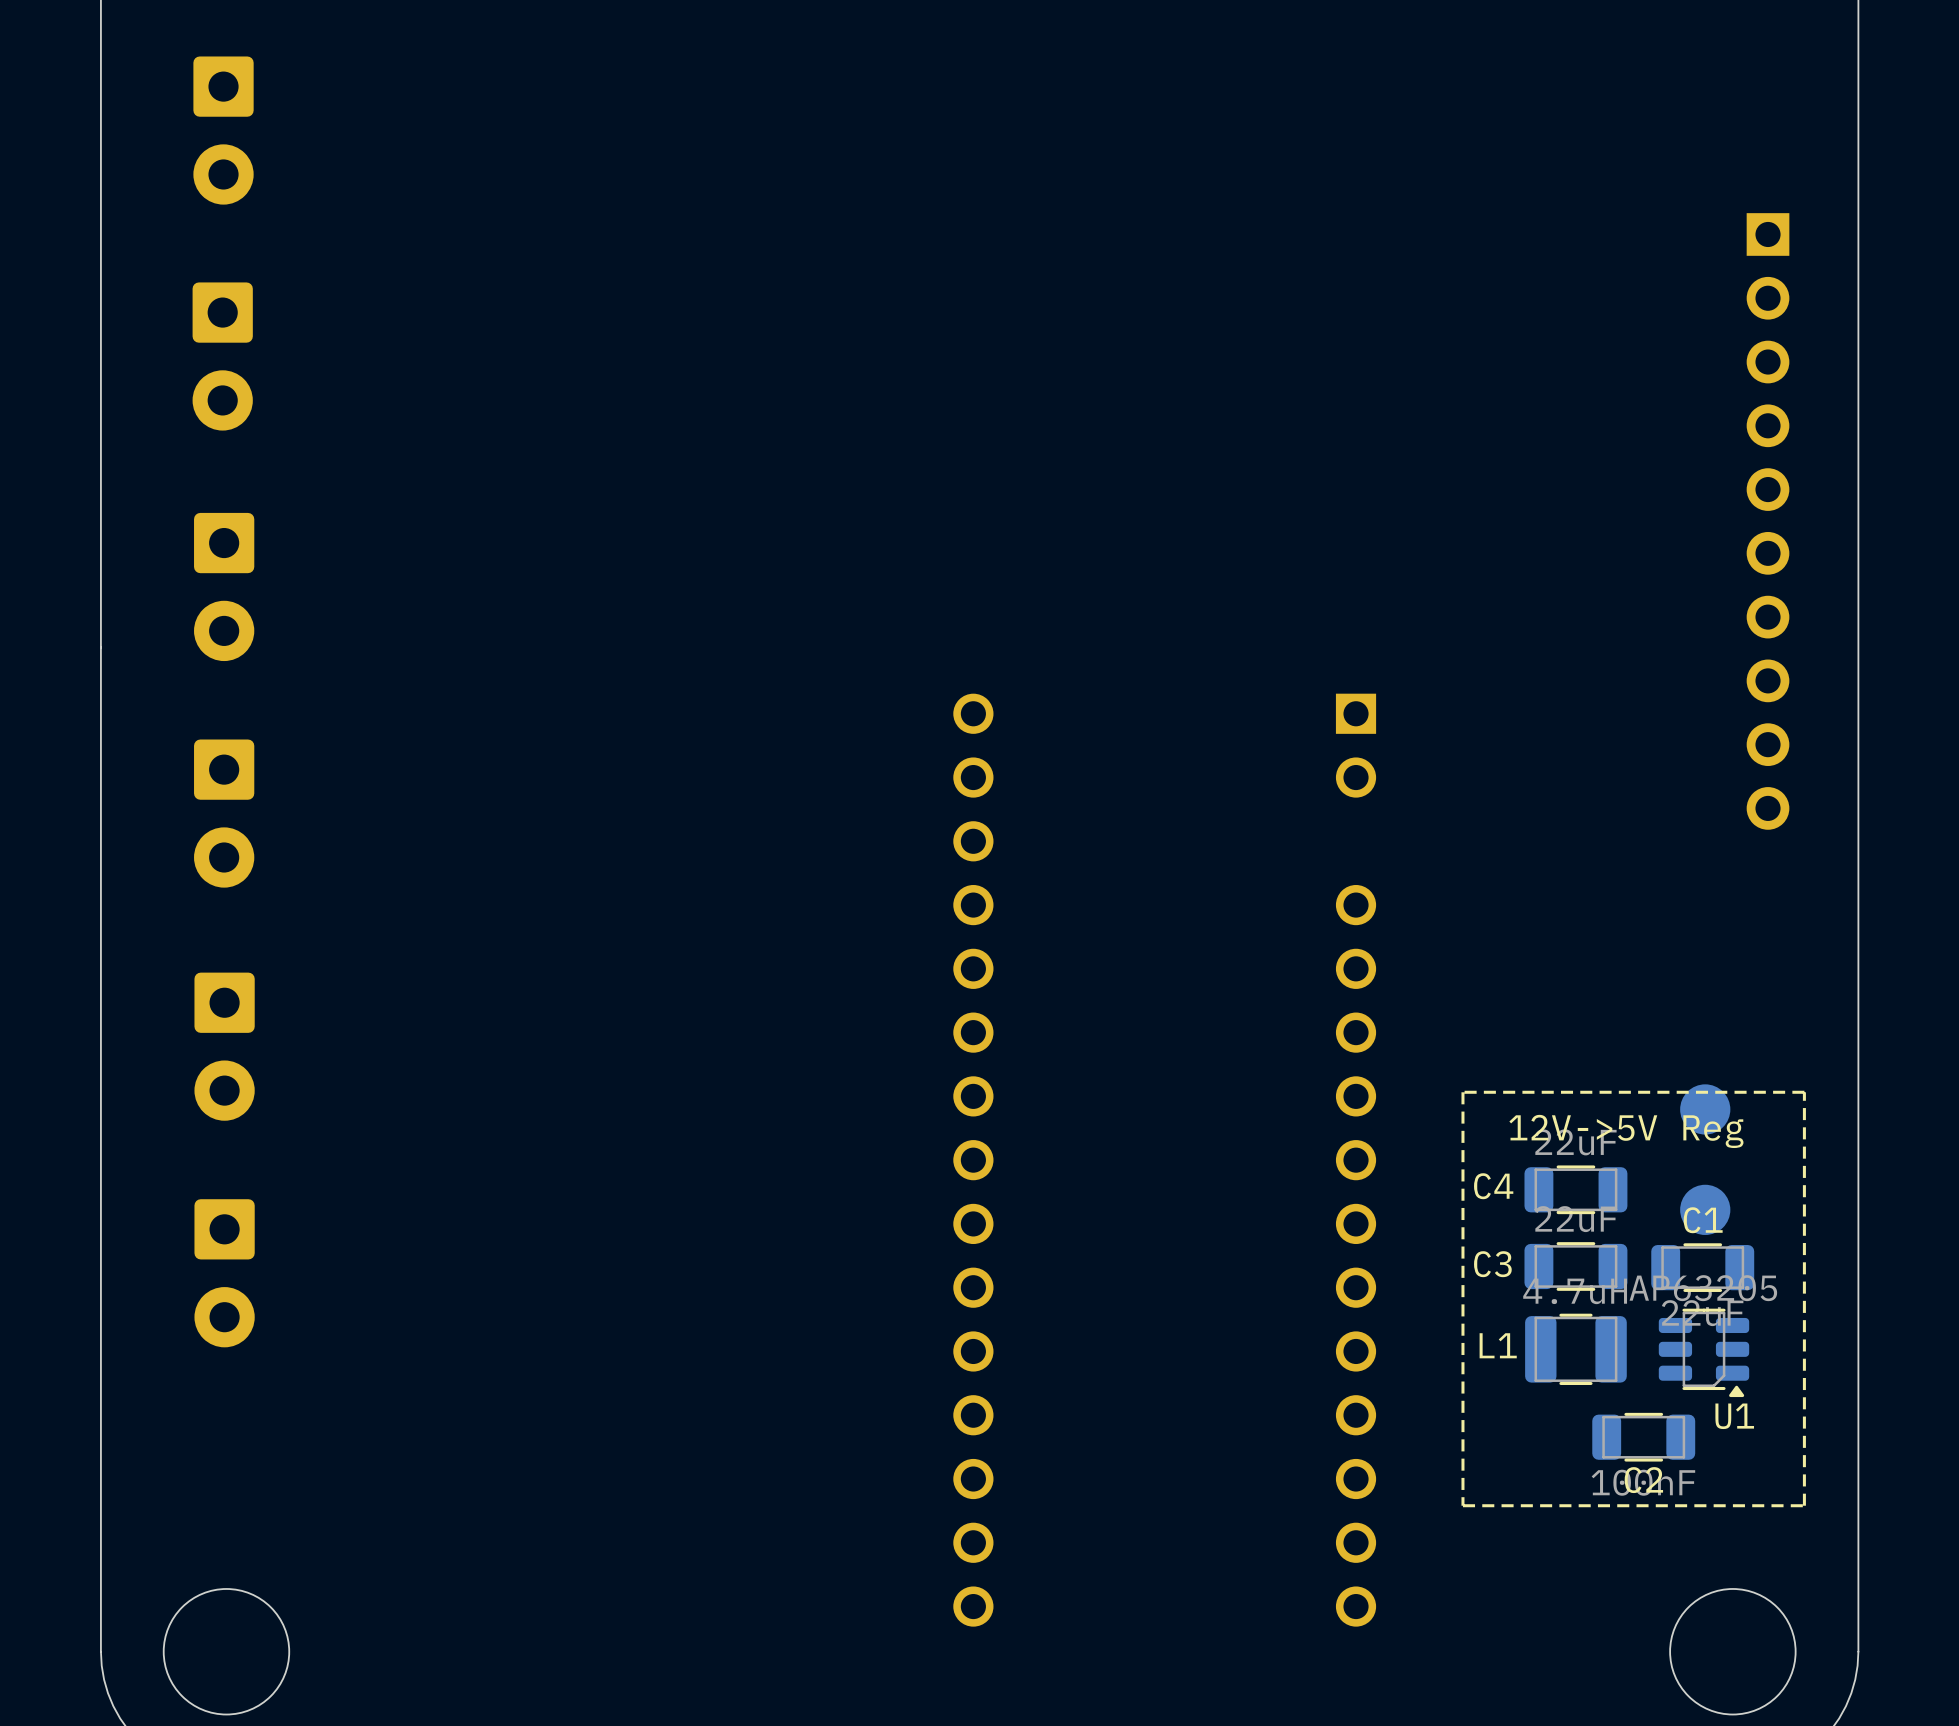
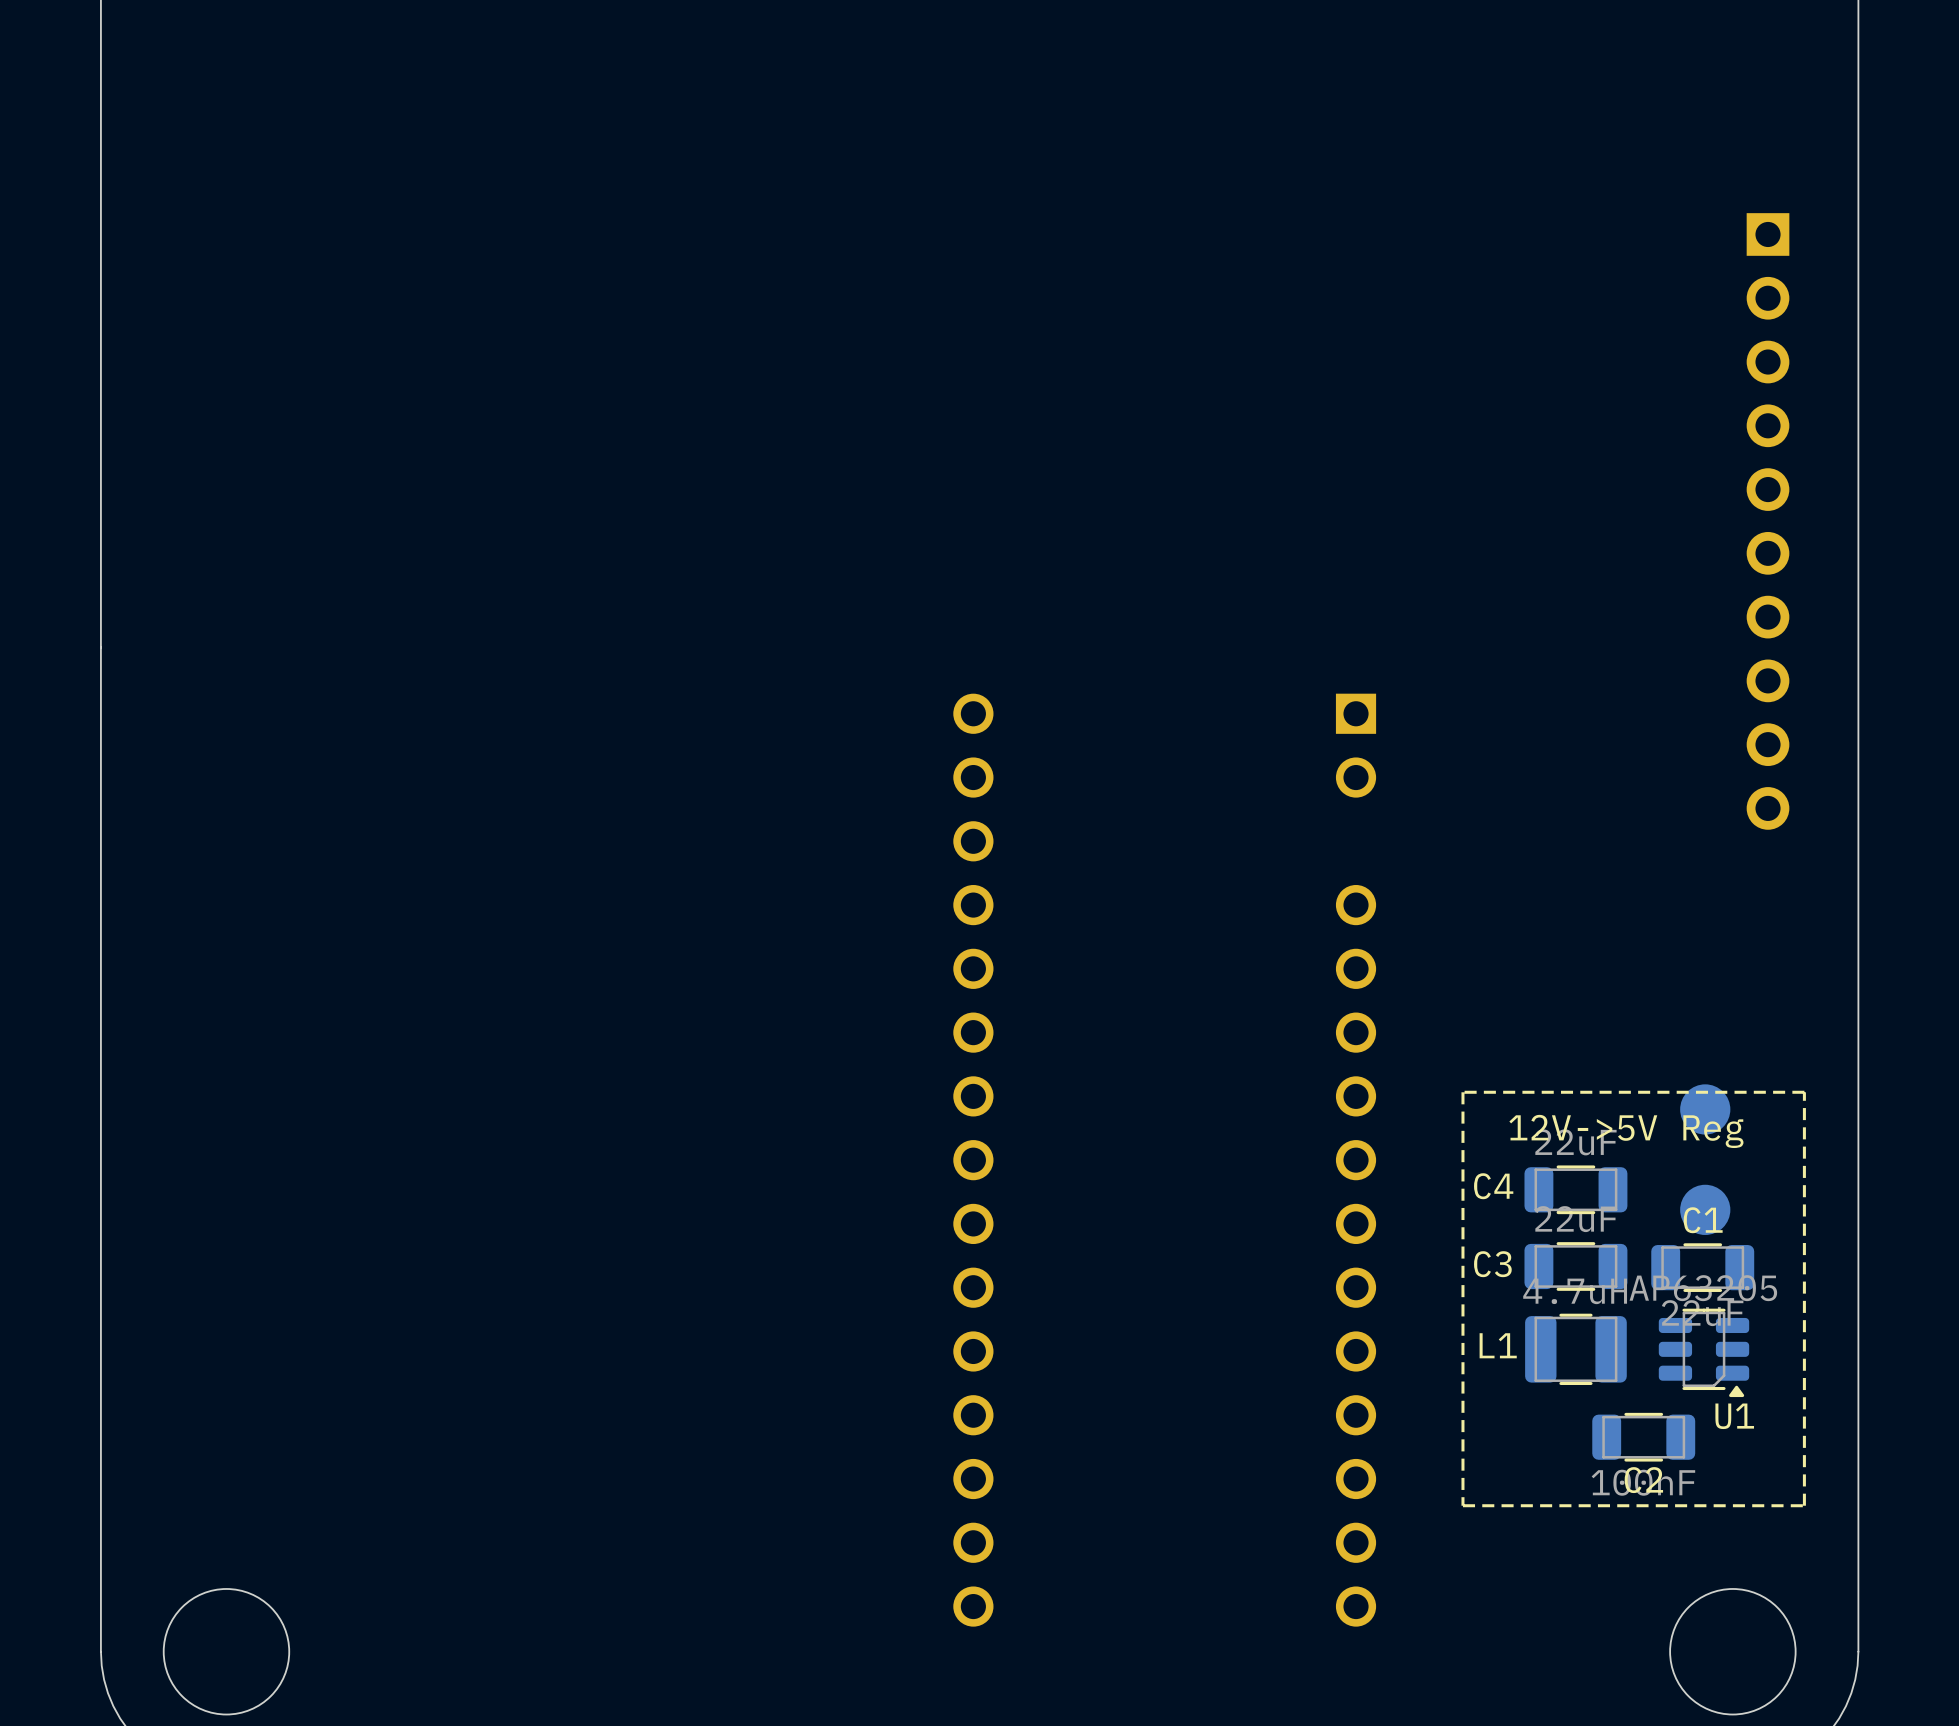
part: (223, 130) -> none
part: (222, 356) -> none
part: (224, 586) -> none
part: (224, 813) -> none
part: (224, 1046) -> none
part: (224, 1273) -> none

